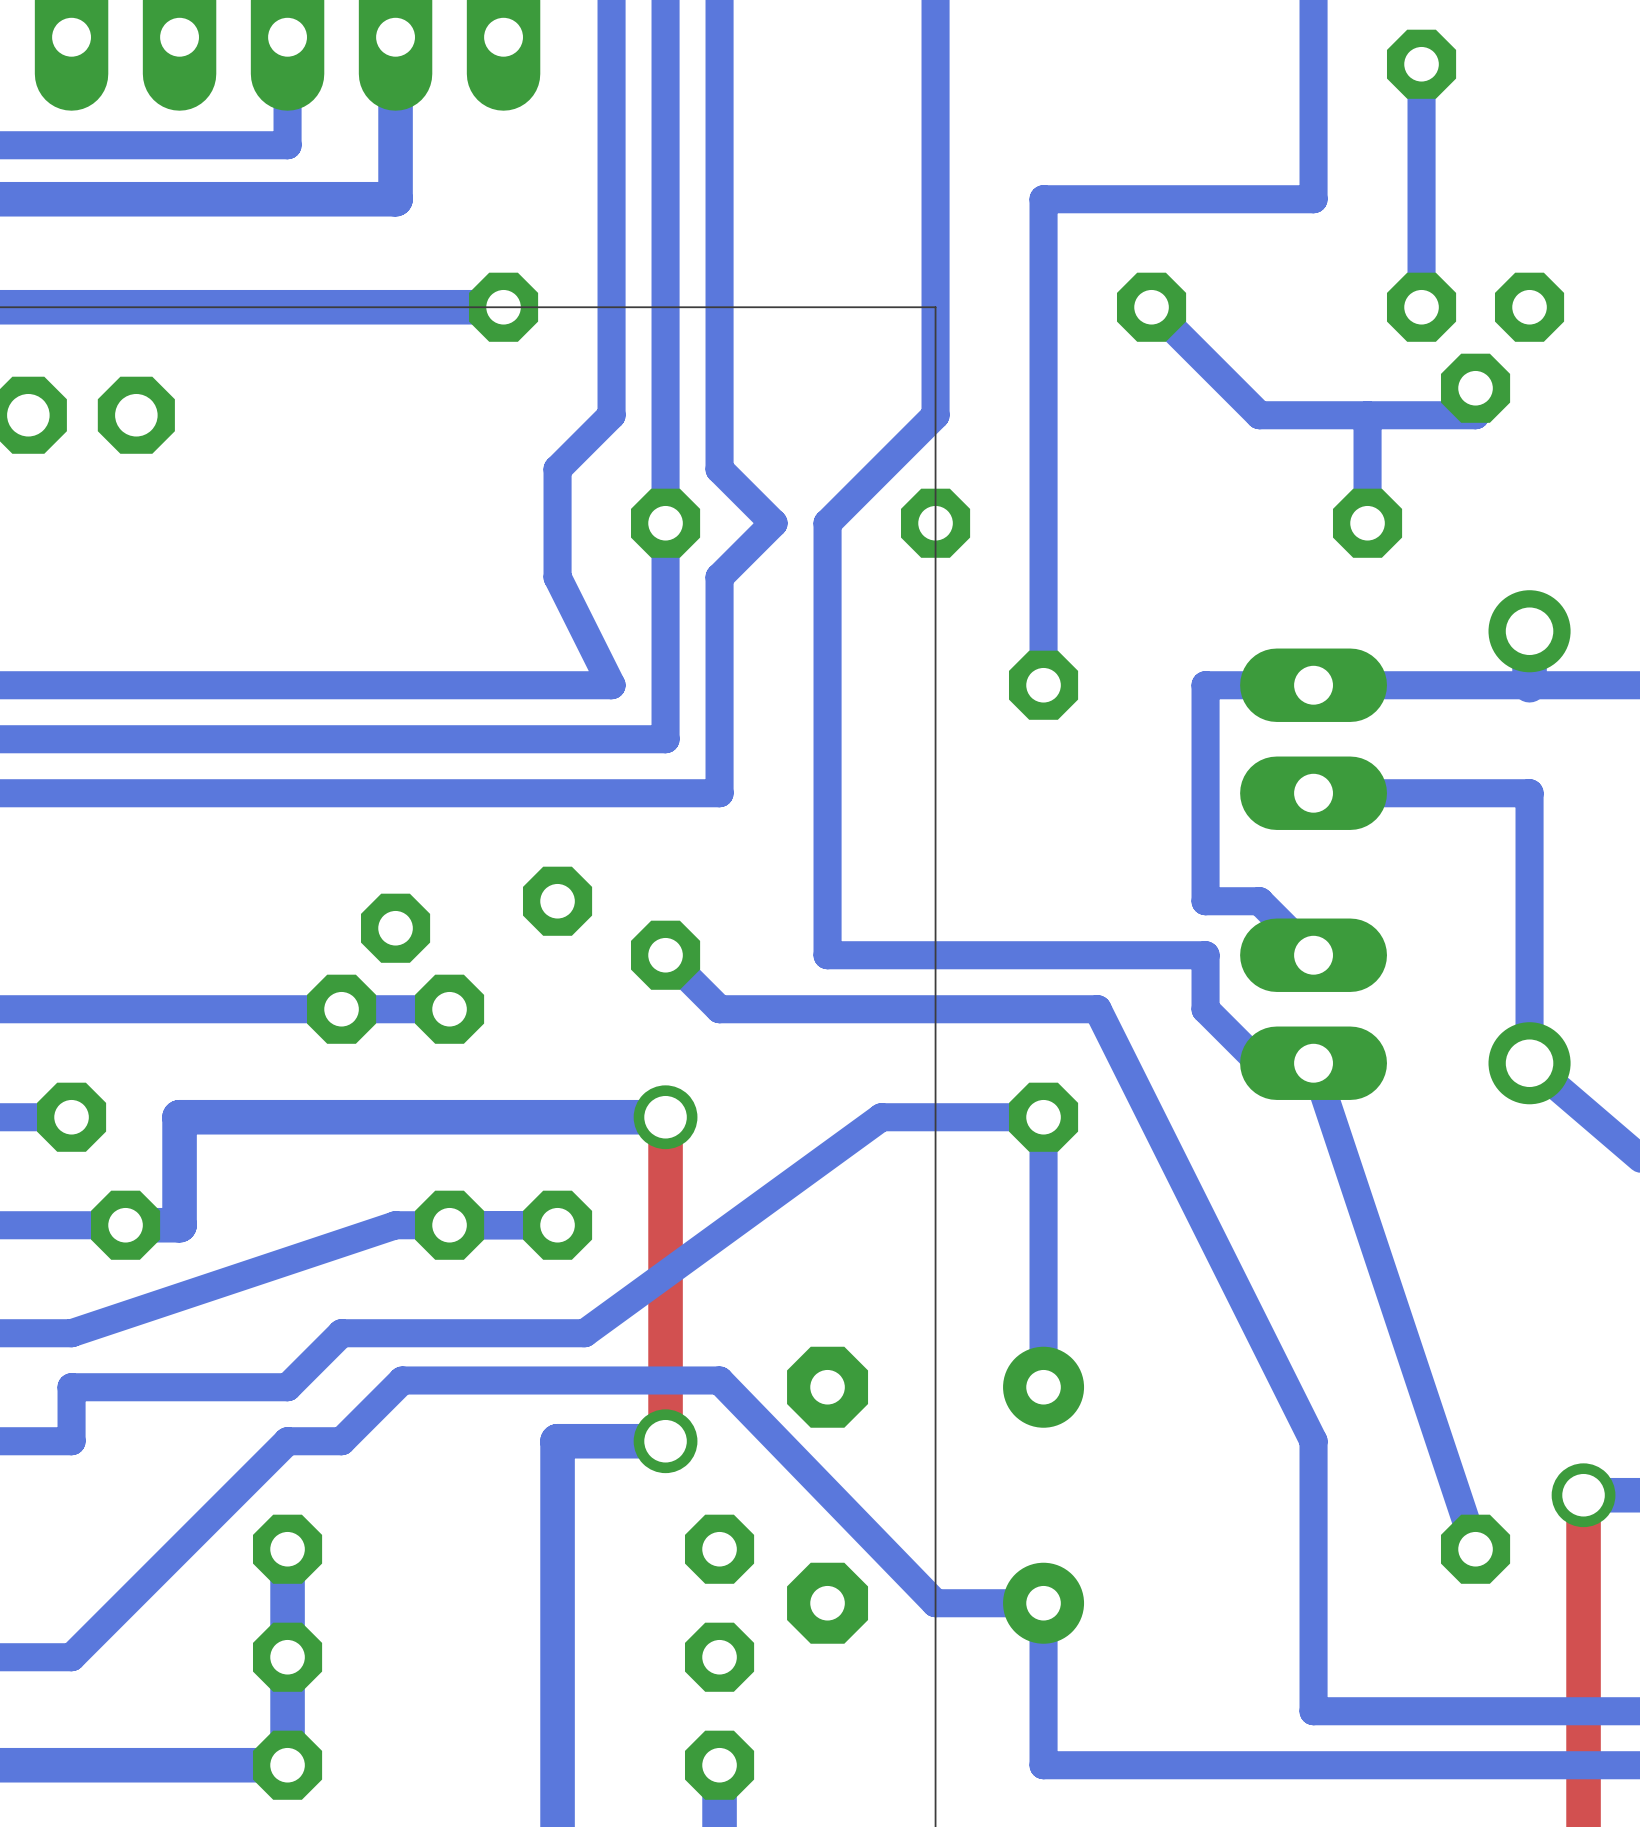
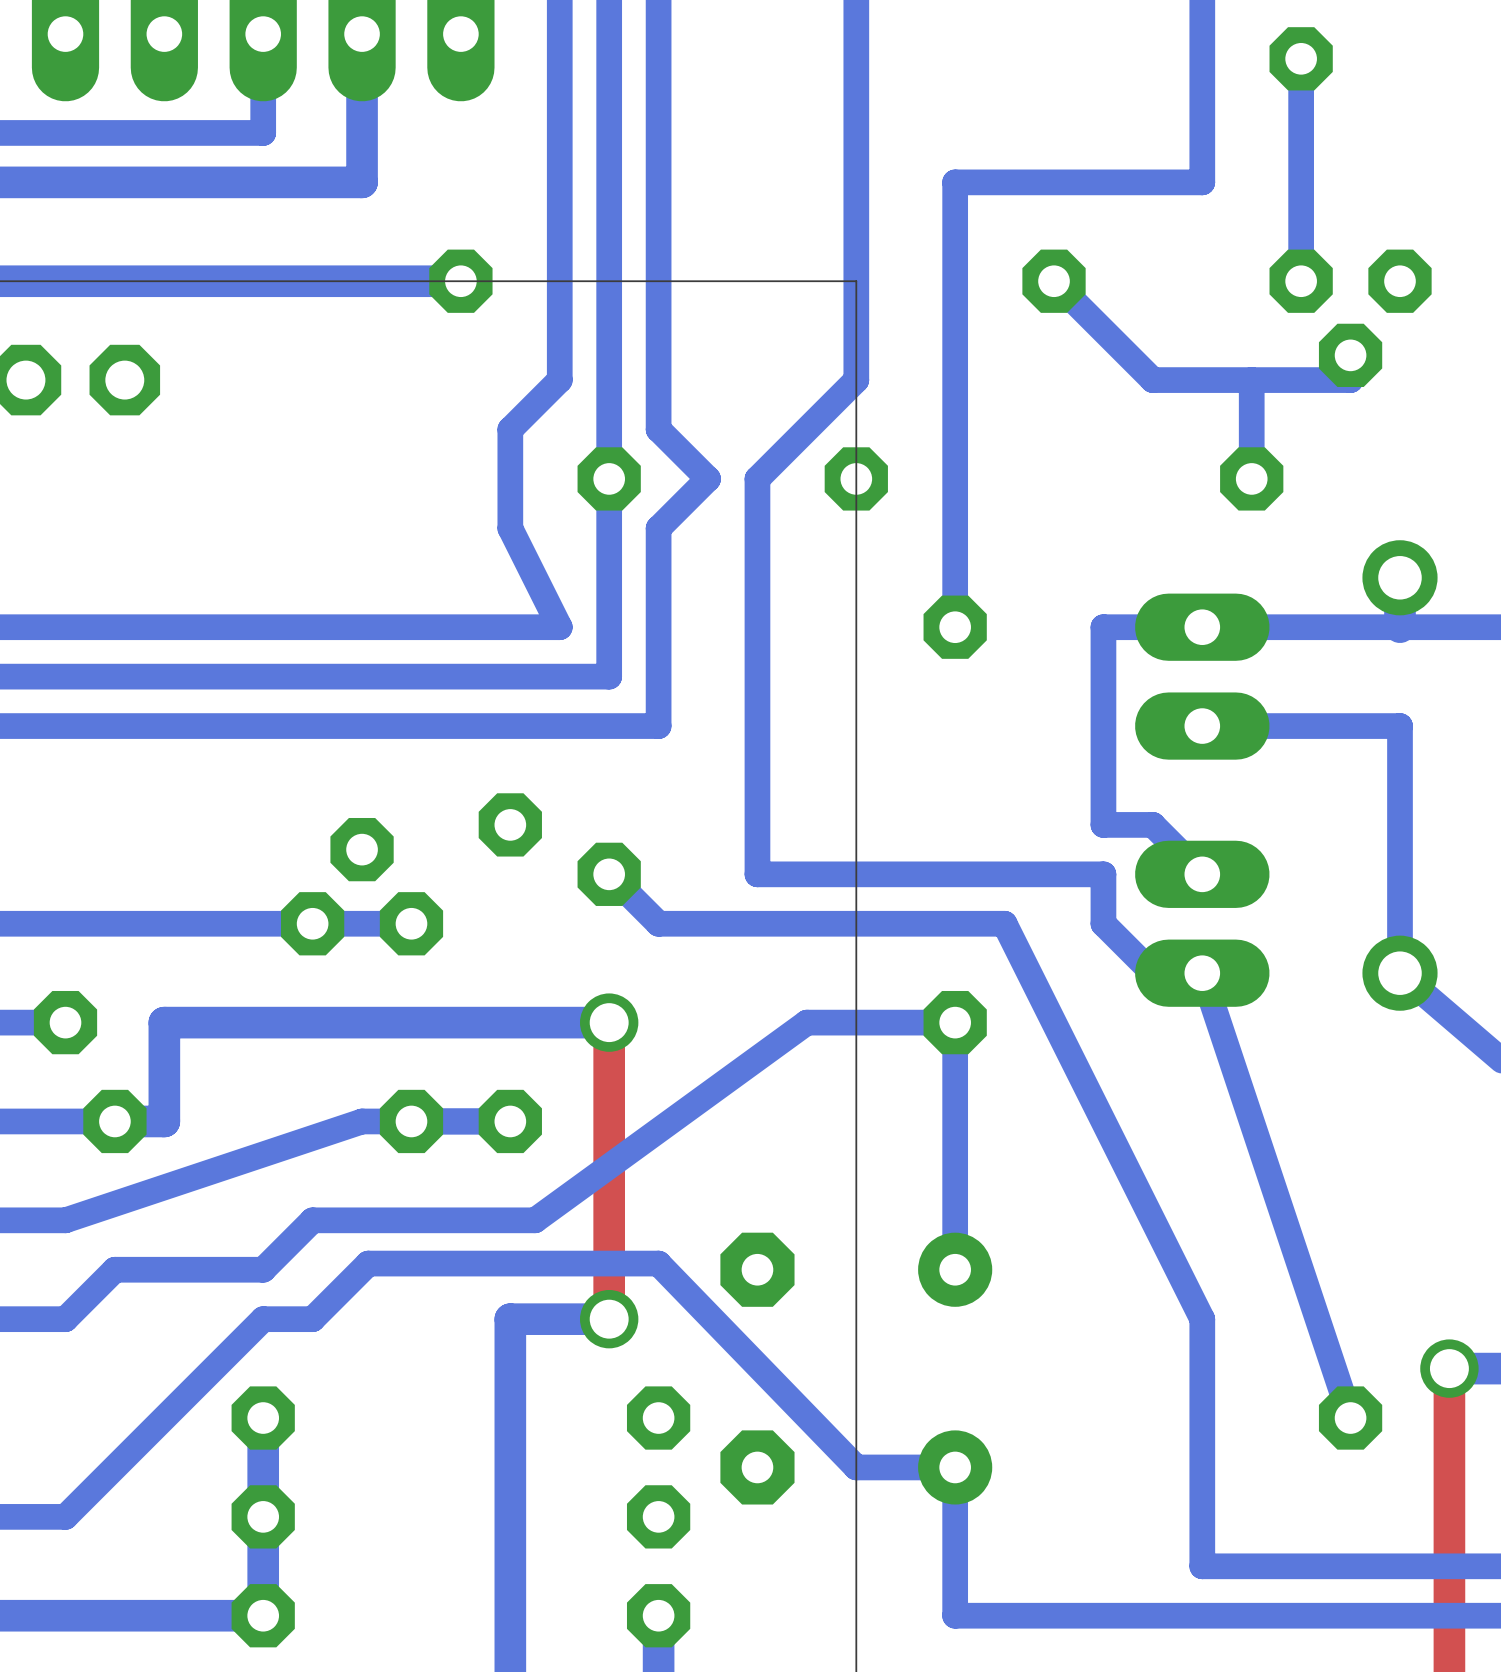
bottom track: (125, 1387) (71, 1387) (71, 1441) -> (114, 1269) (65, 1319)

